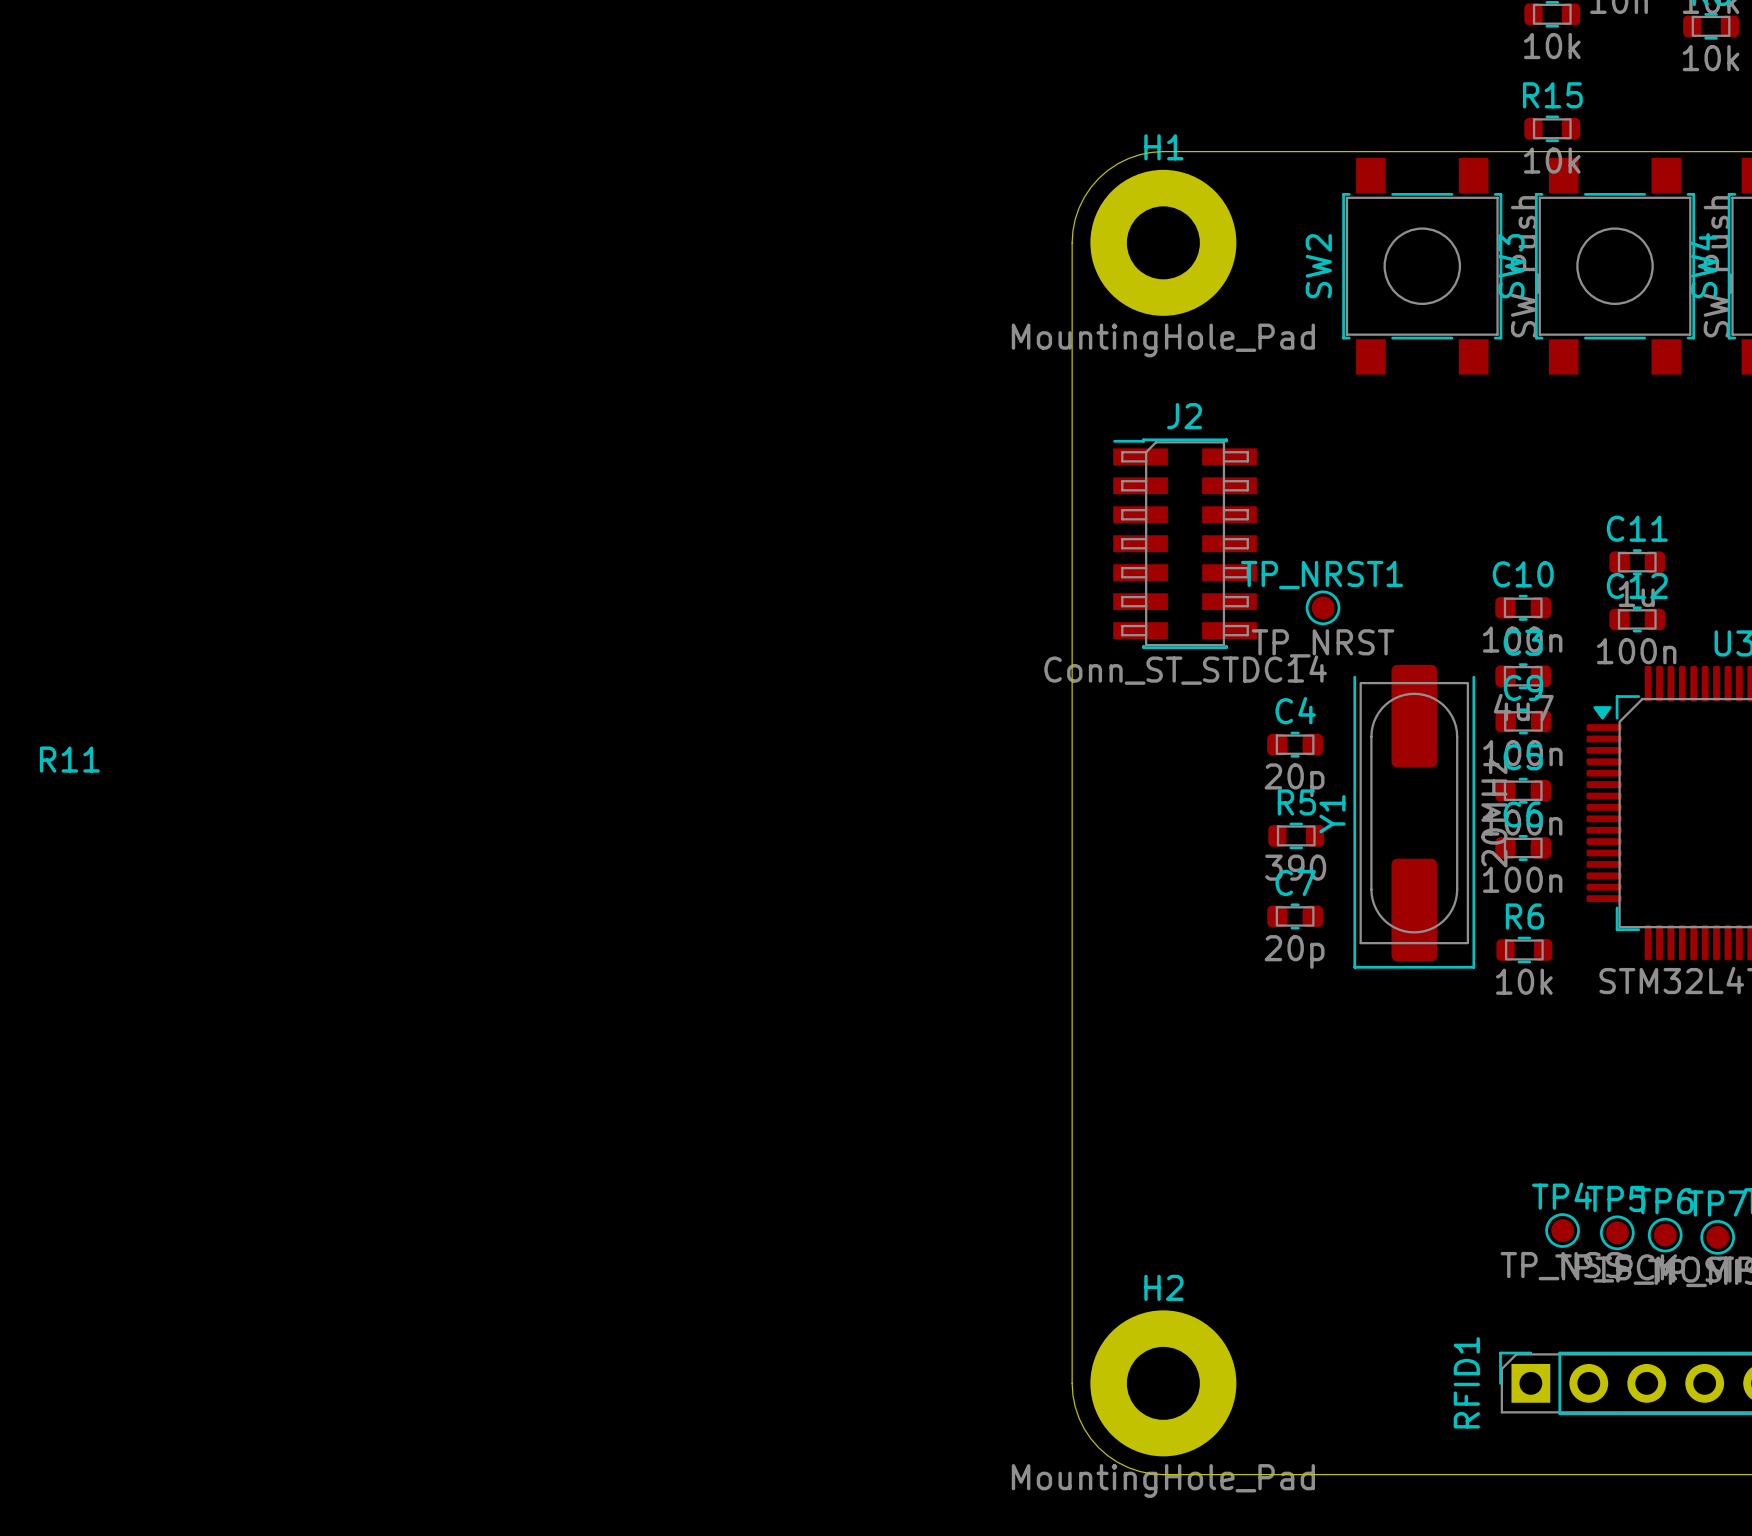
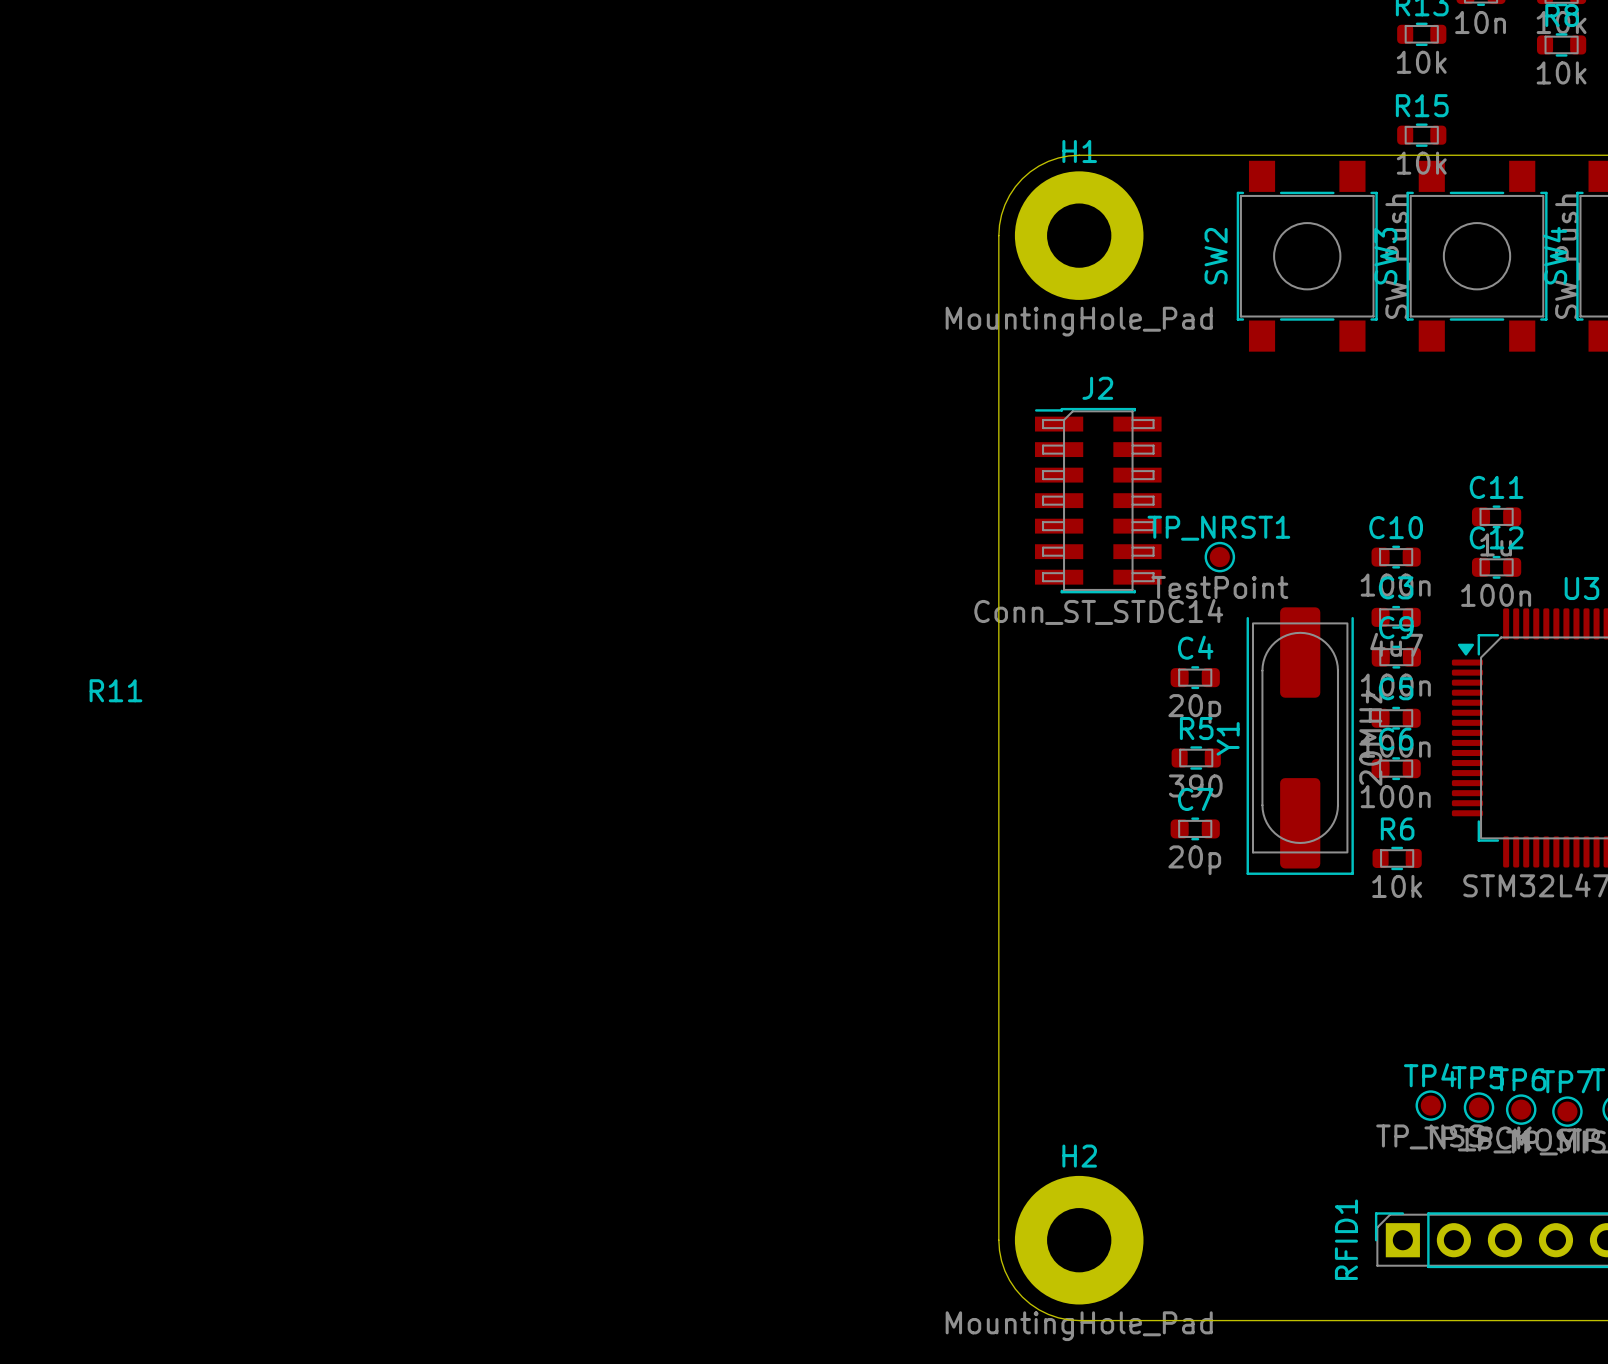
TP_NRST1 value: TP_NRST (1323, 643) -> TestPoint (1219, 587)

